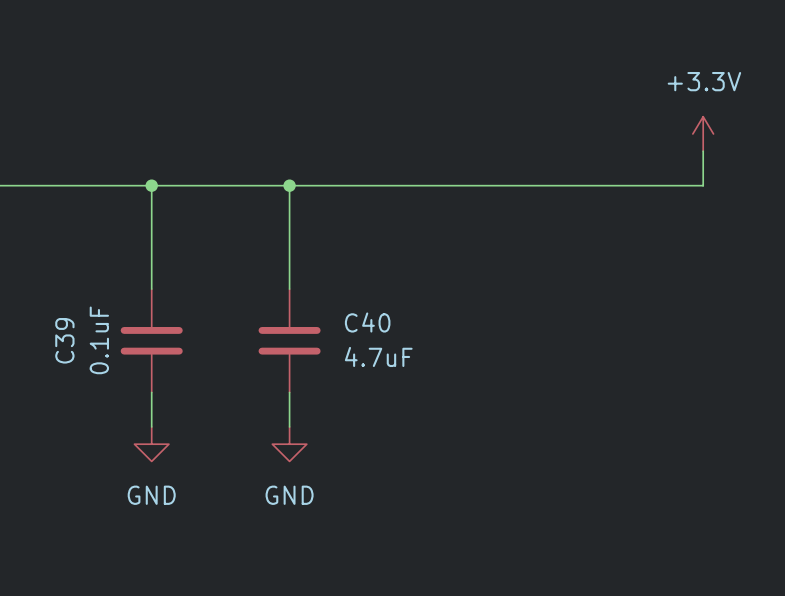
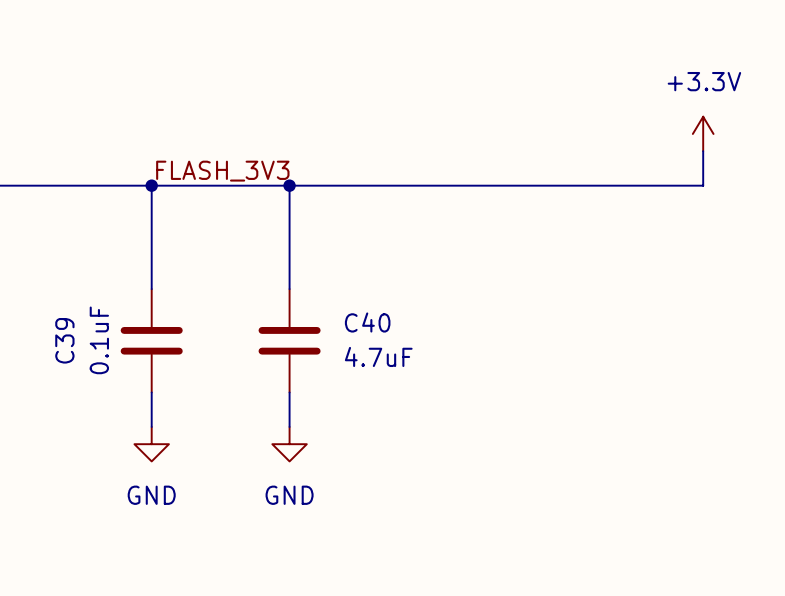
label: none -> FLASH_3V3 (222, 171)

